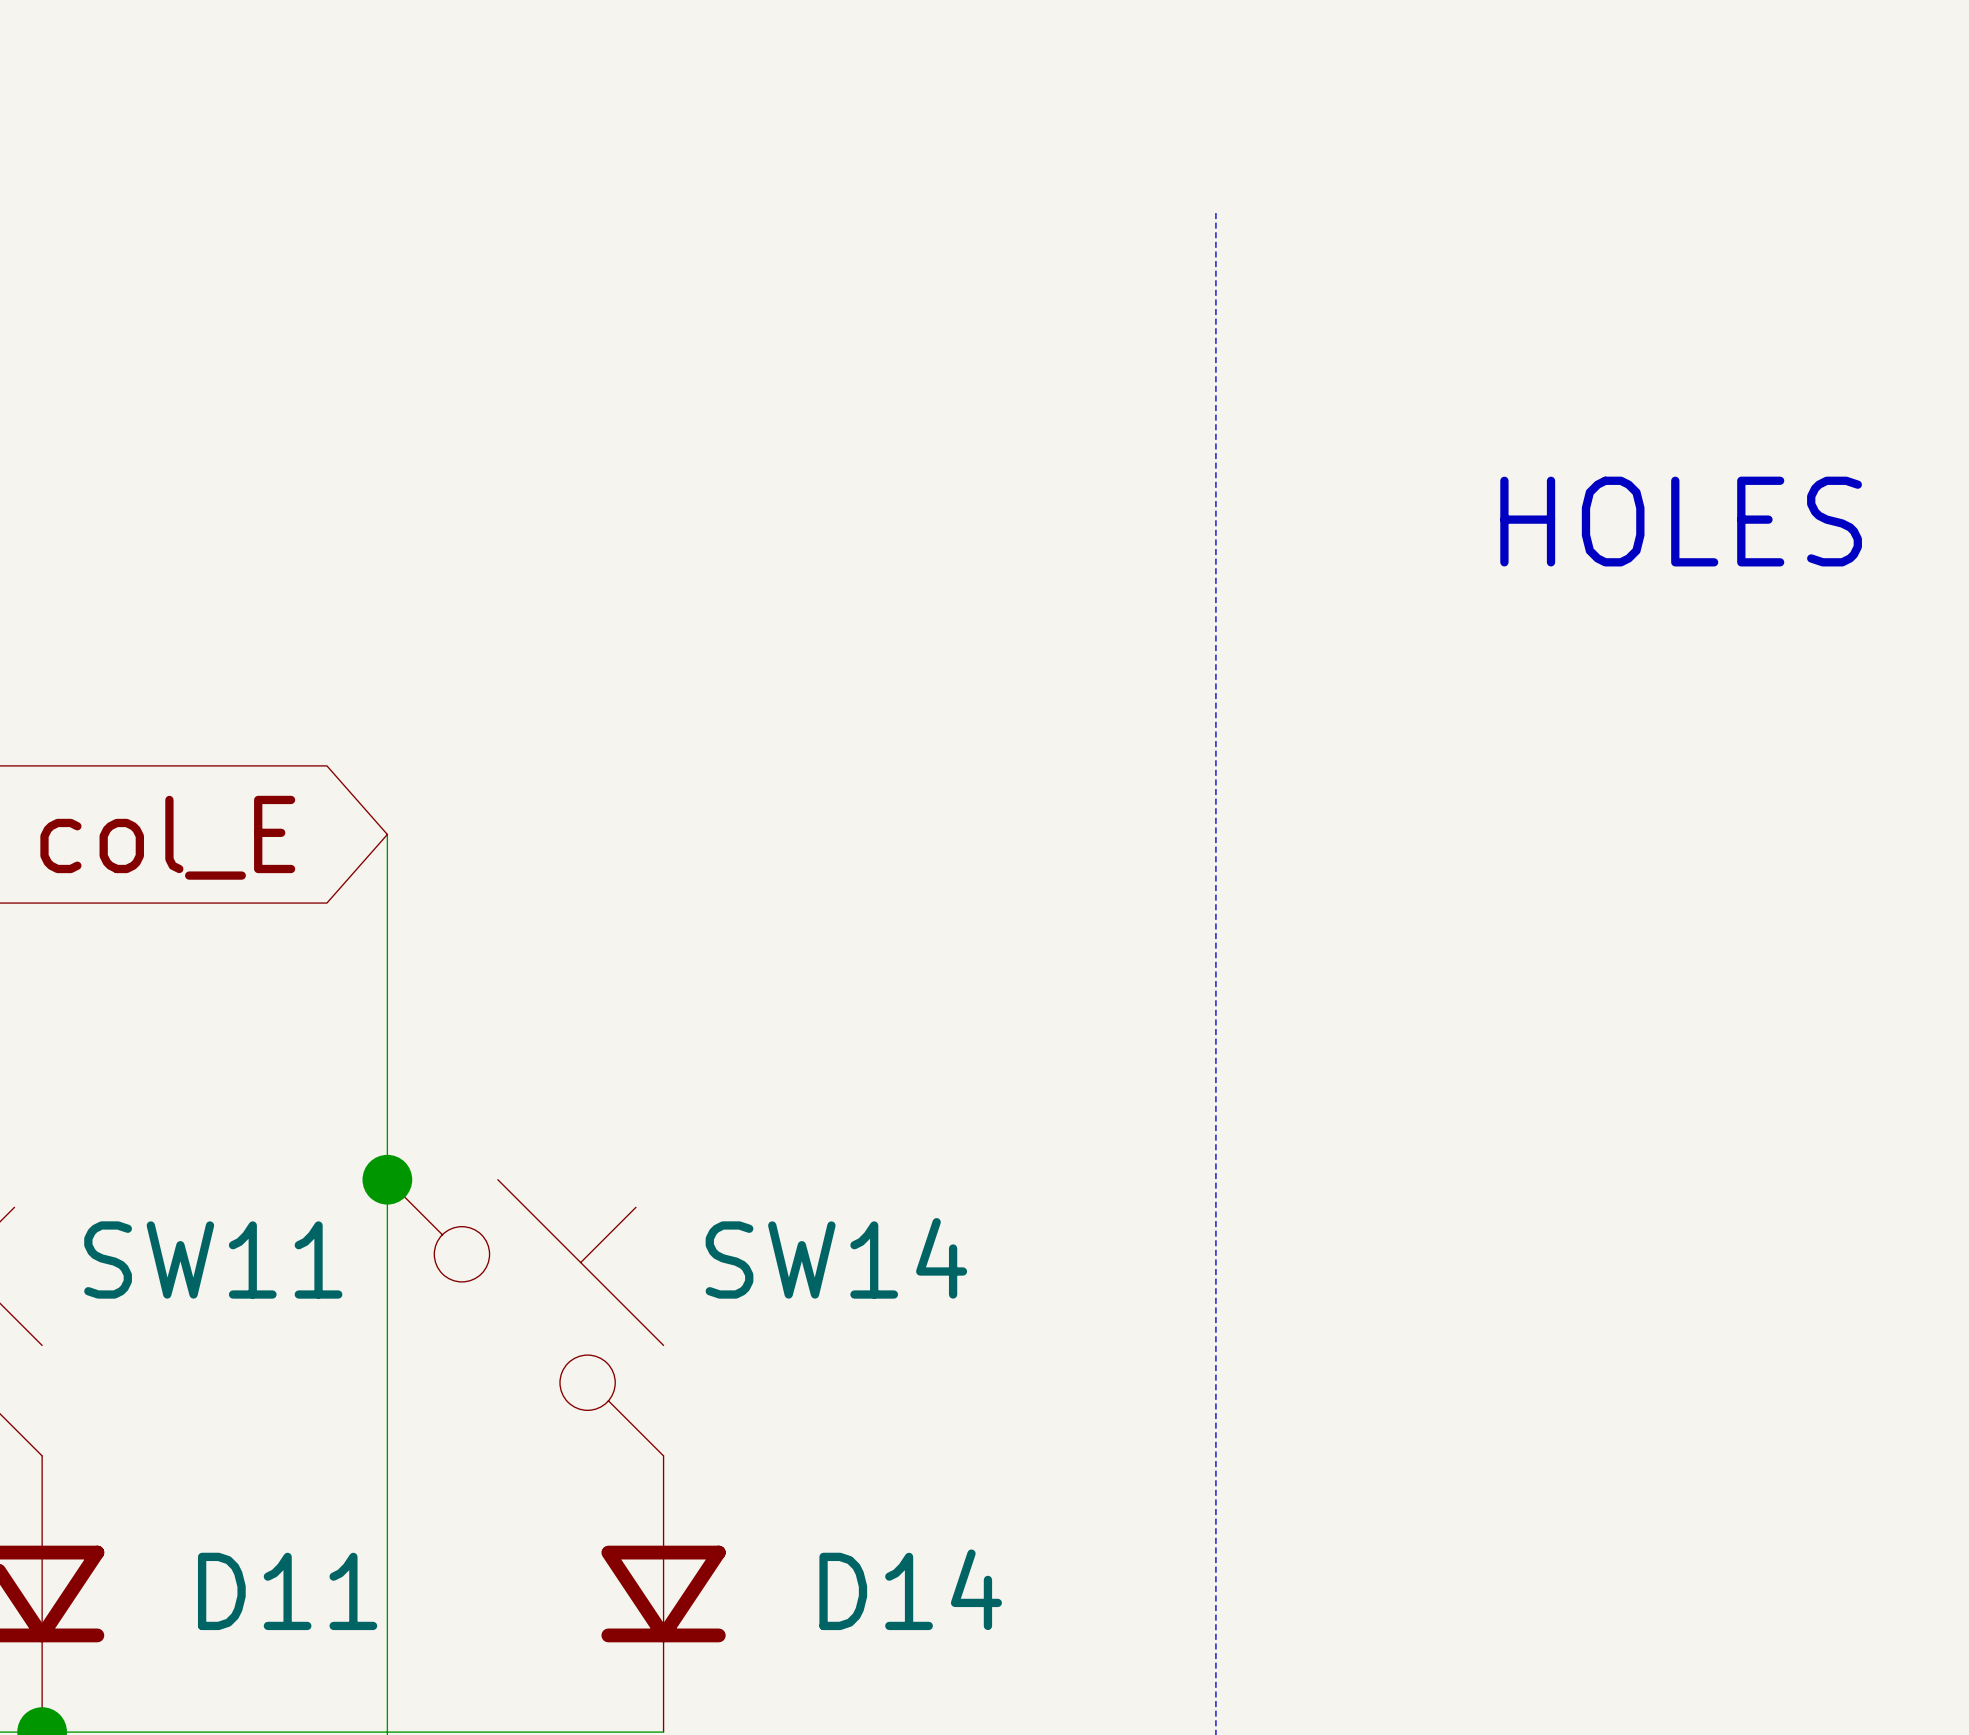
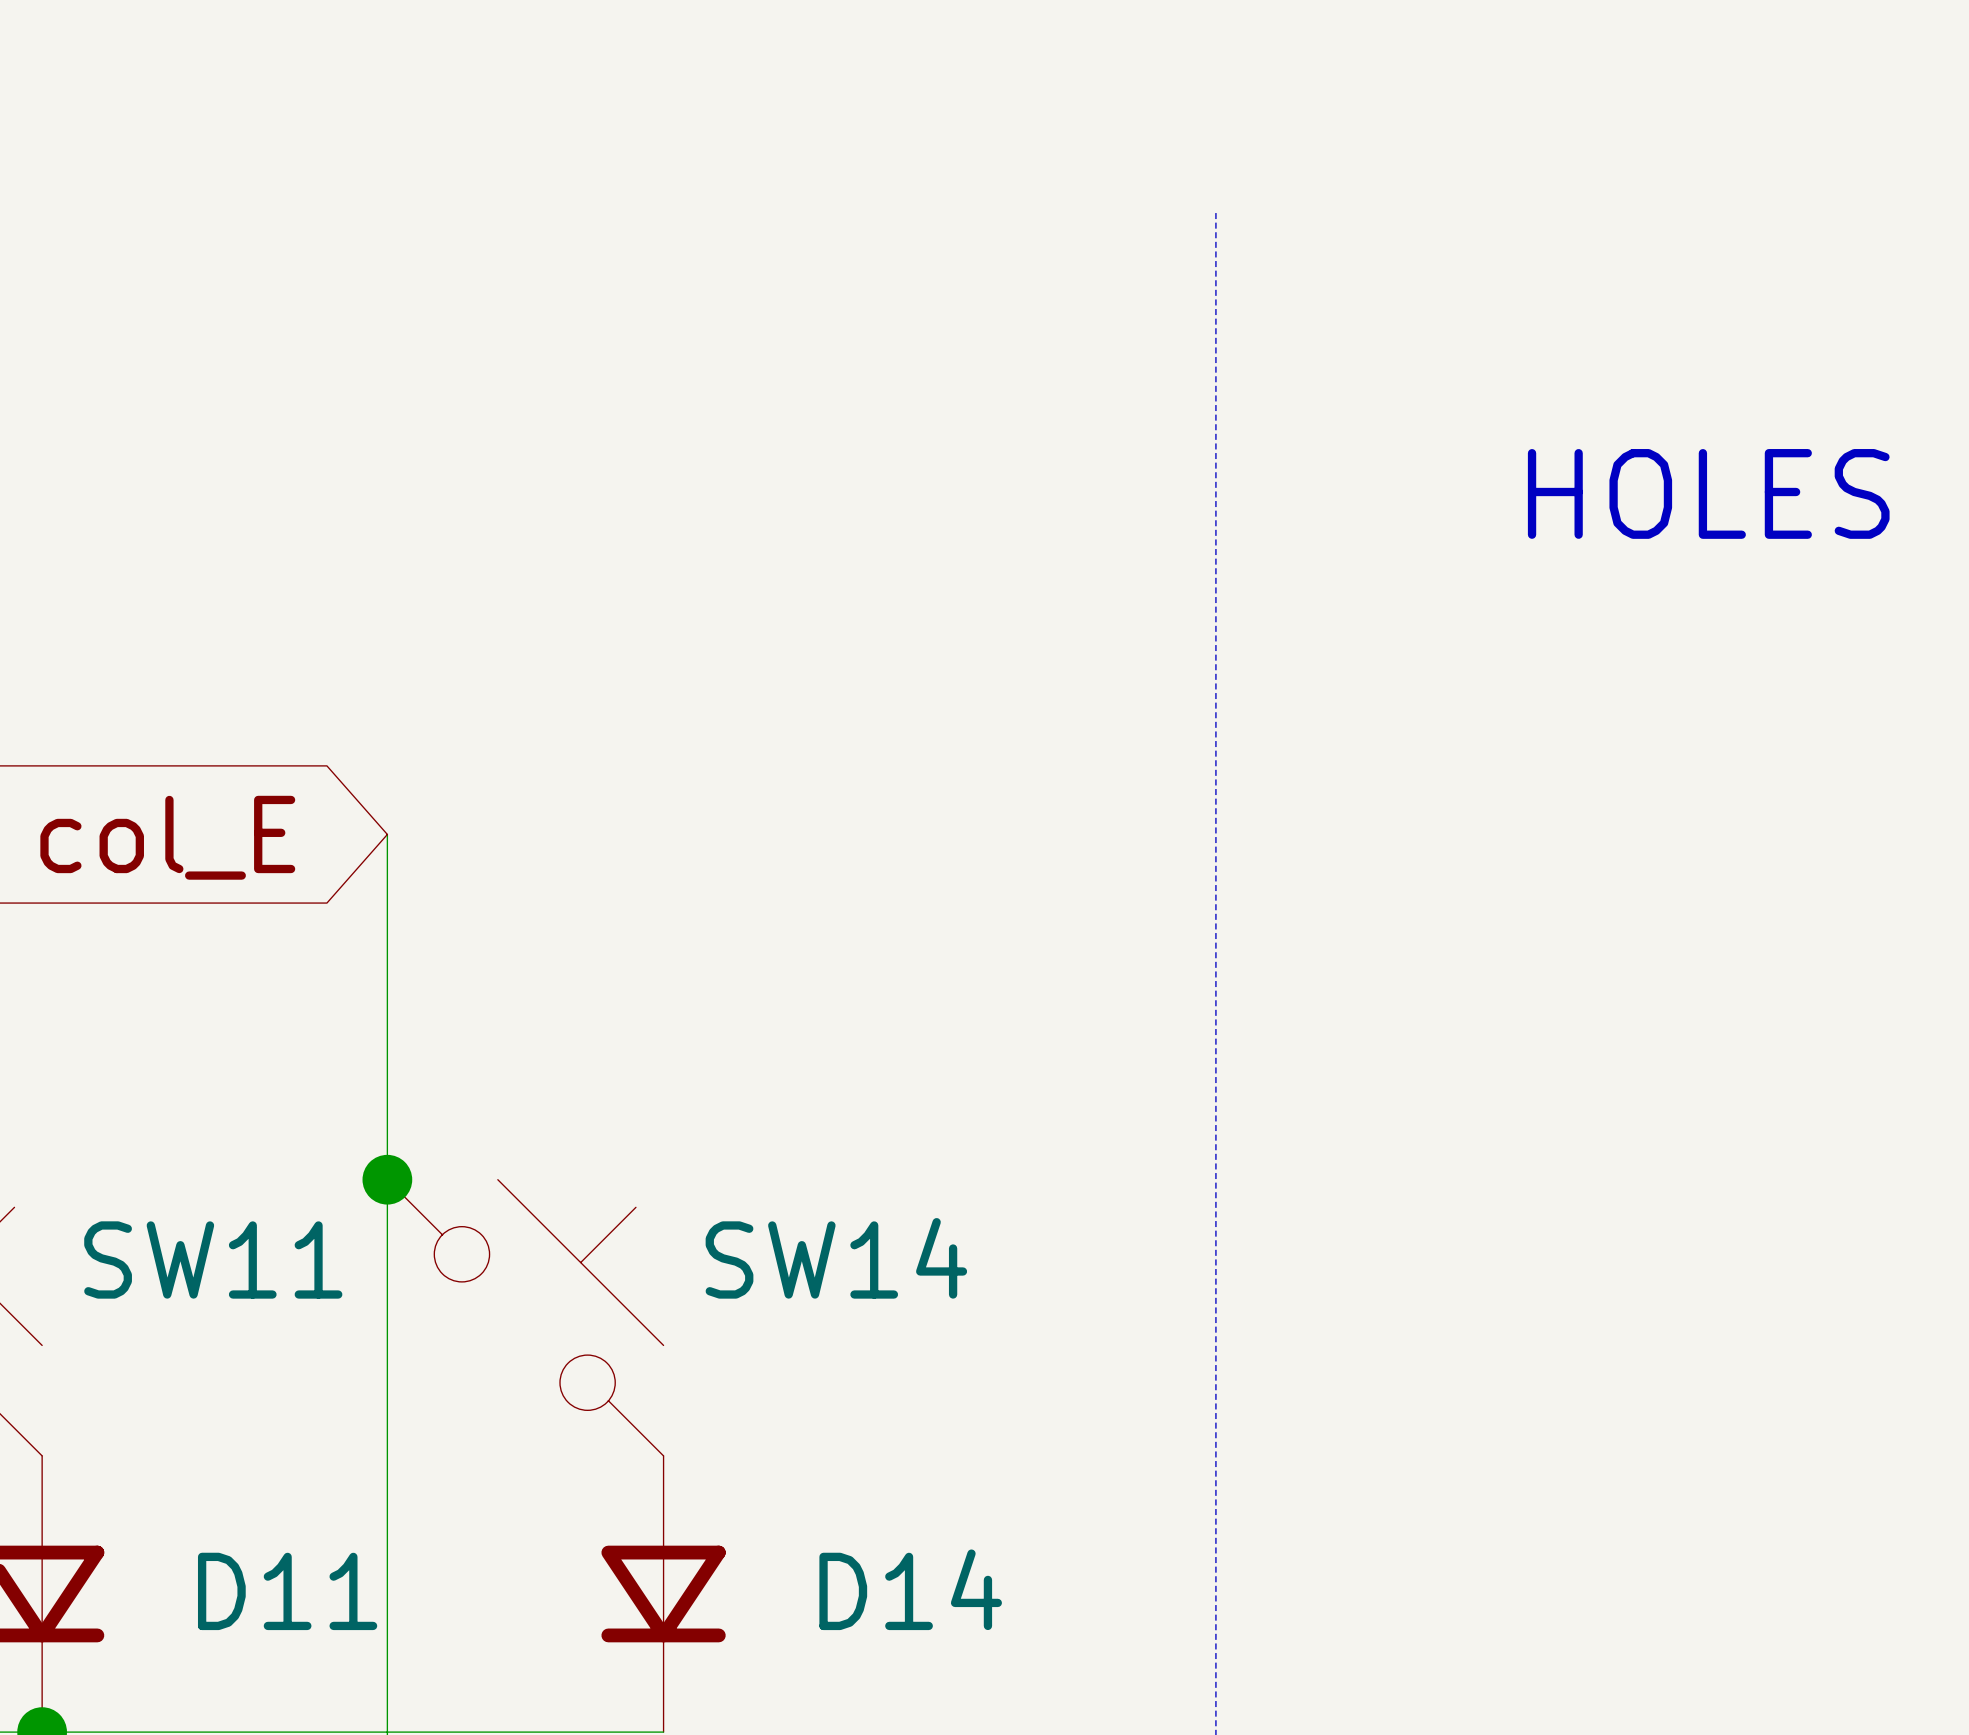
text position: HOLES (1681, 521) -> HOLES (1708, 493)

